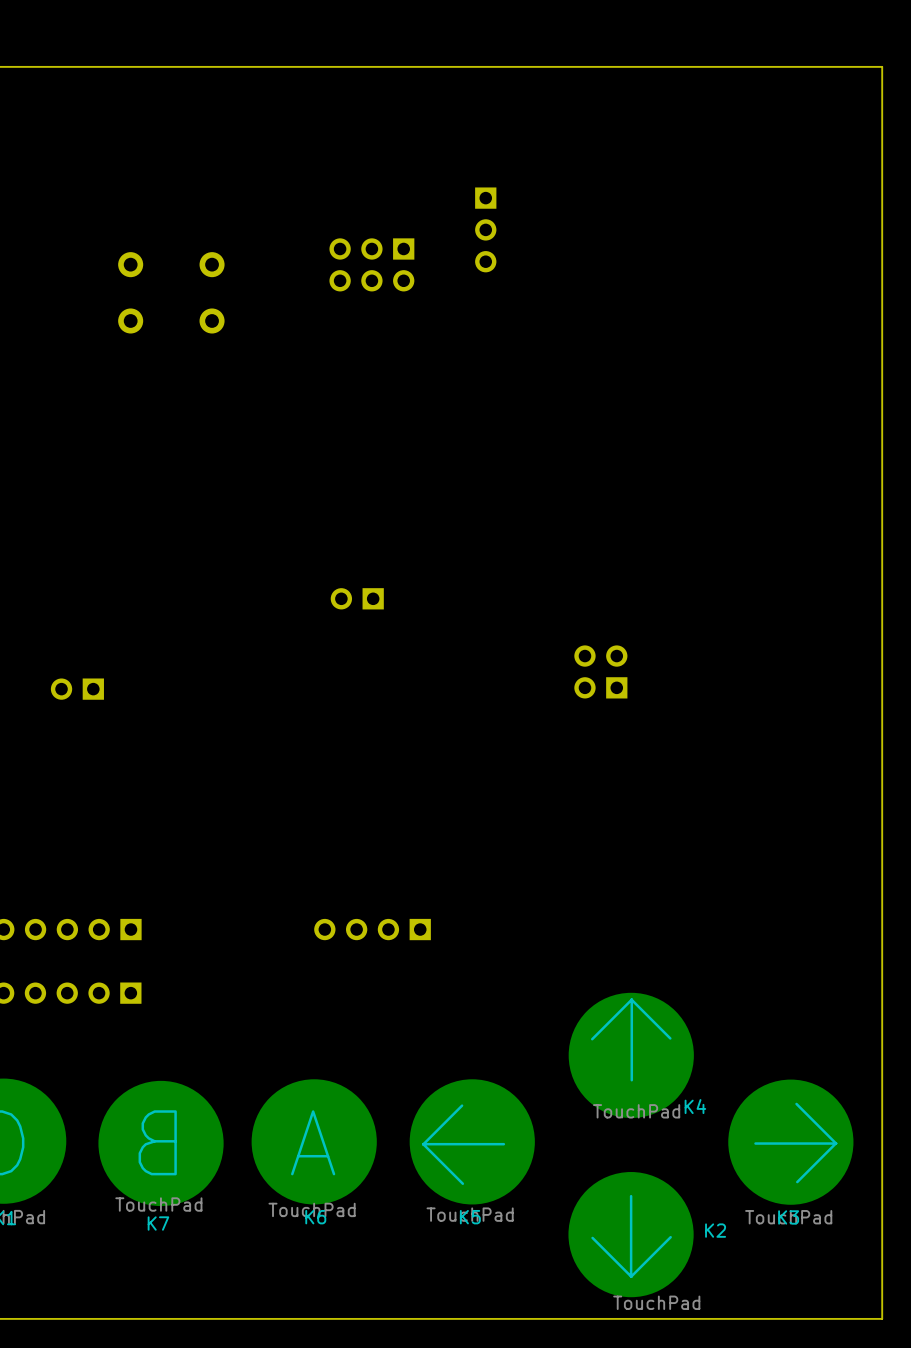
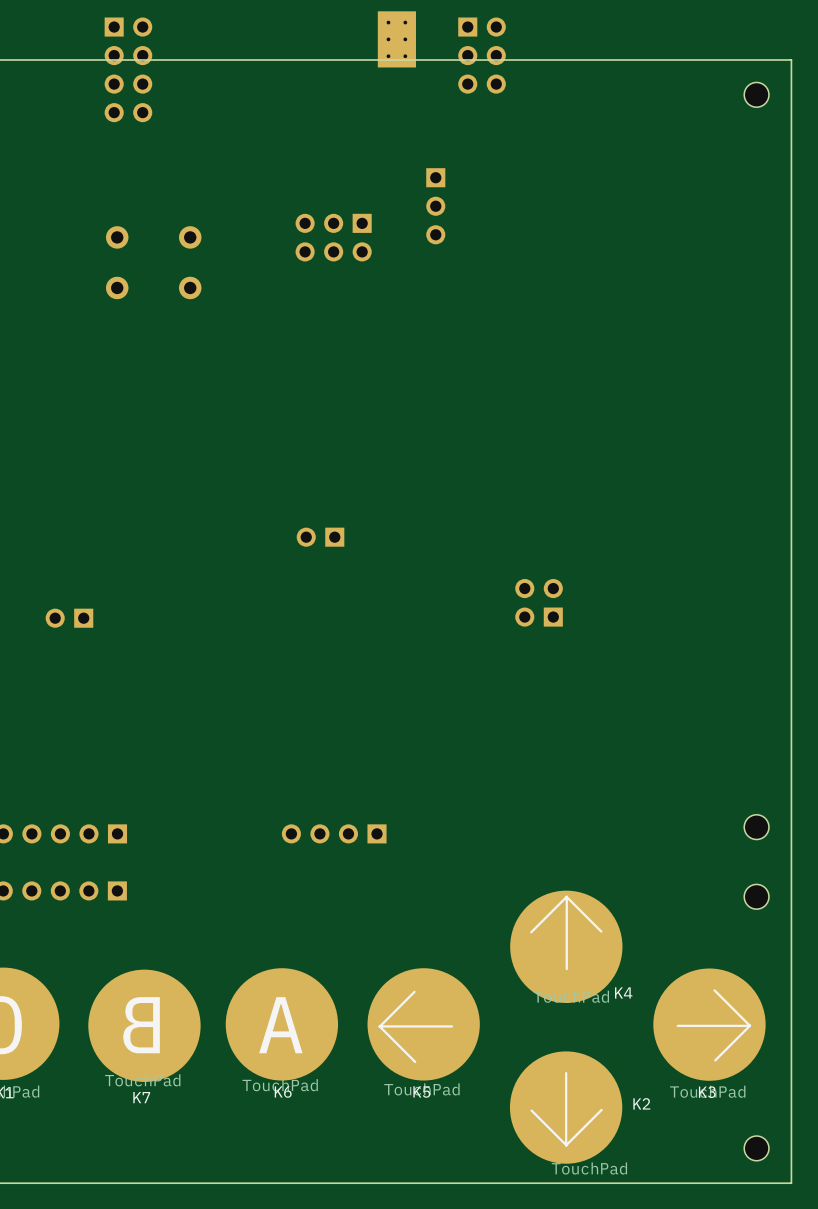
part: none -> (396, 39)
part: none -> (482, 55)
part: none -> (128, 69)
part: none -> (756, 94)
part: none -> (756, 827)
part: none -> (756, 896)
part: none -> (756, 1148)

